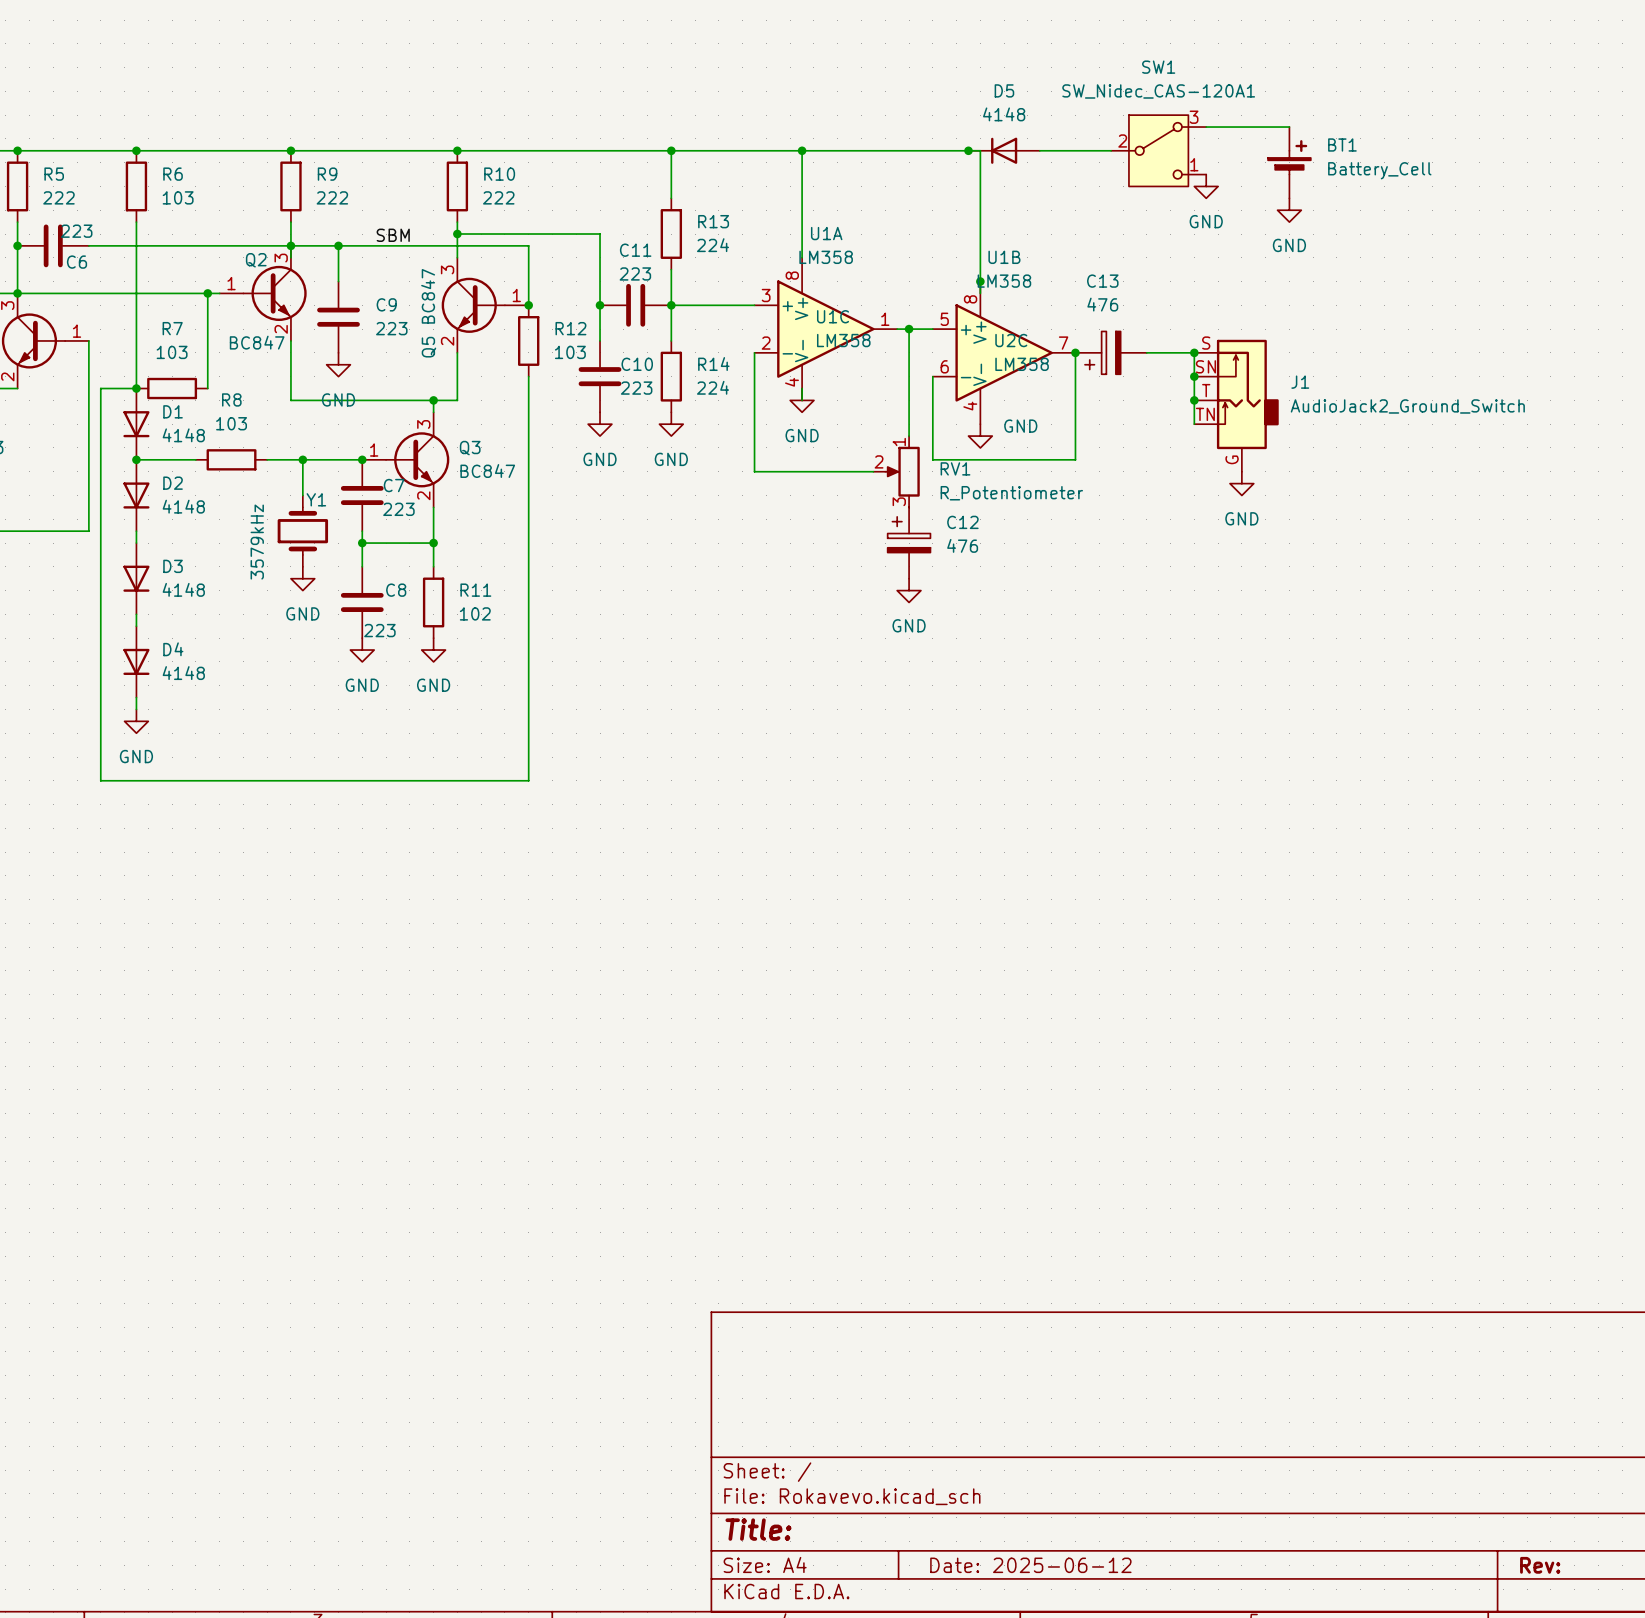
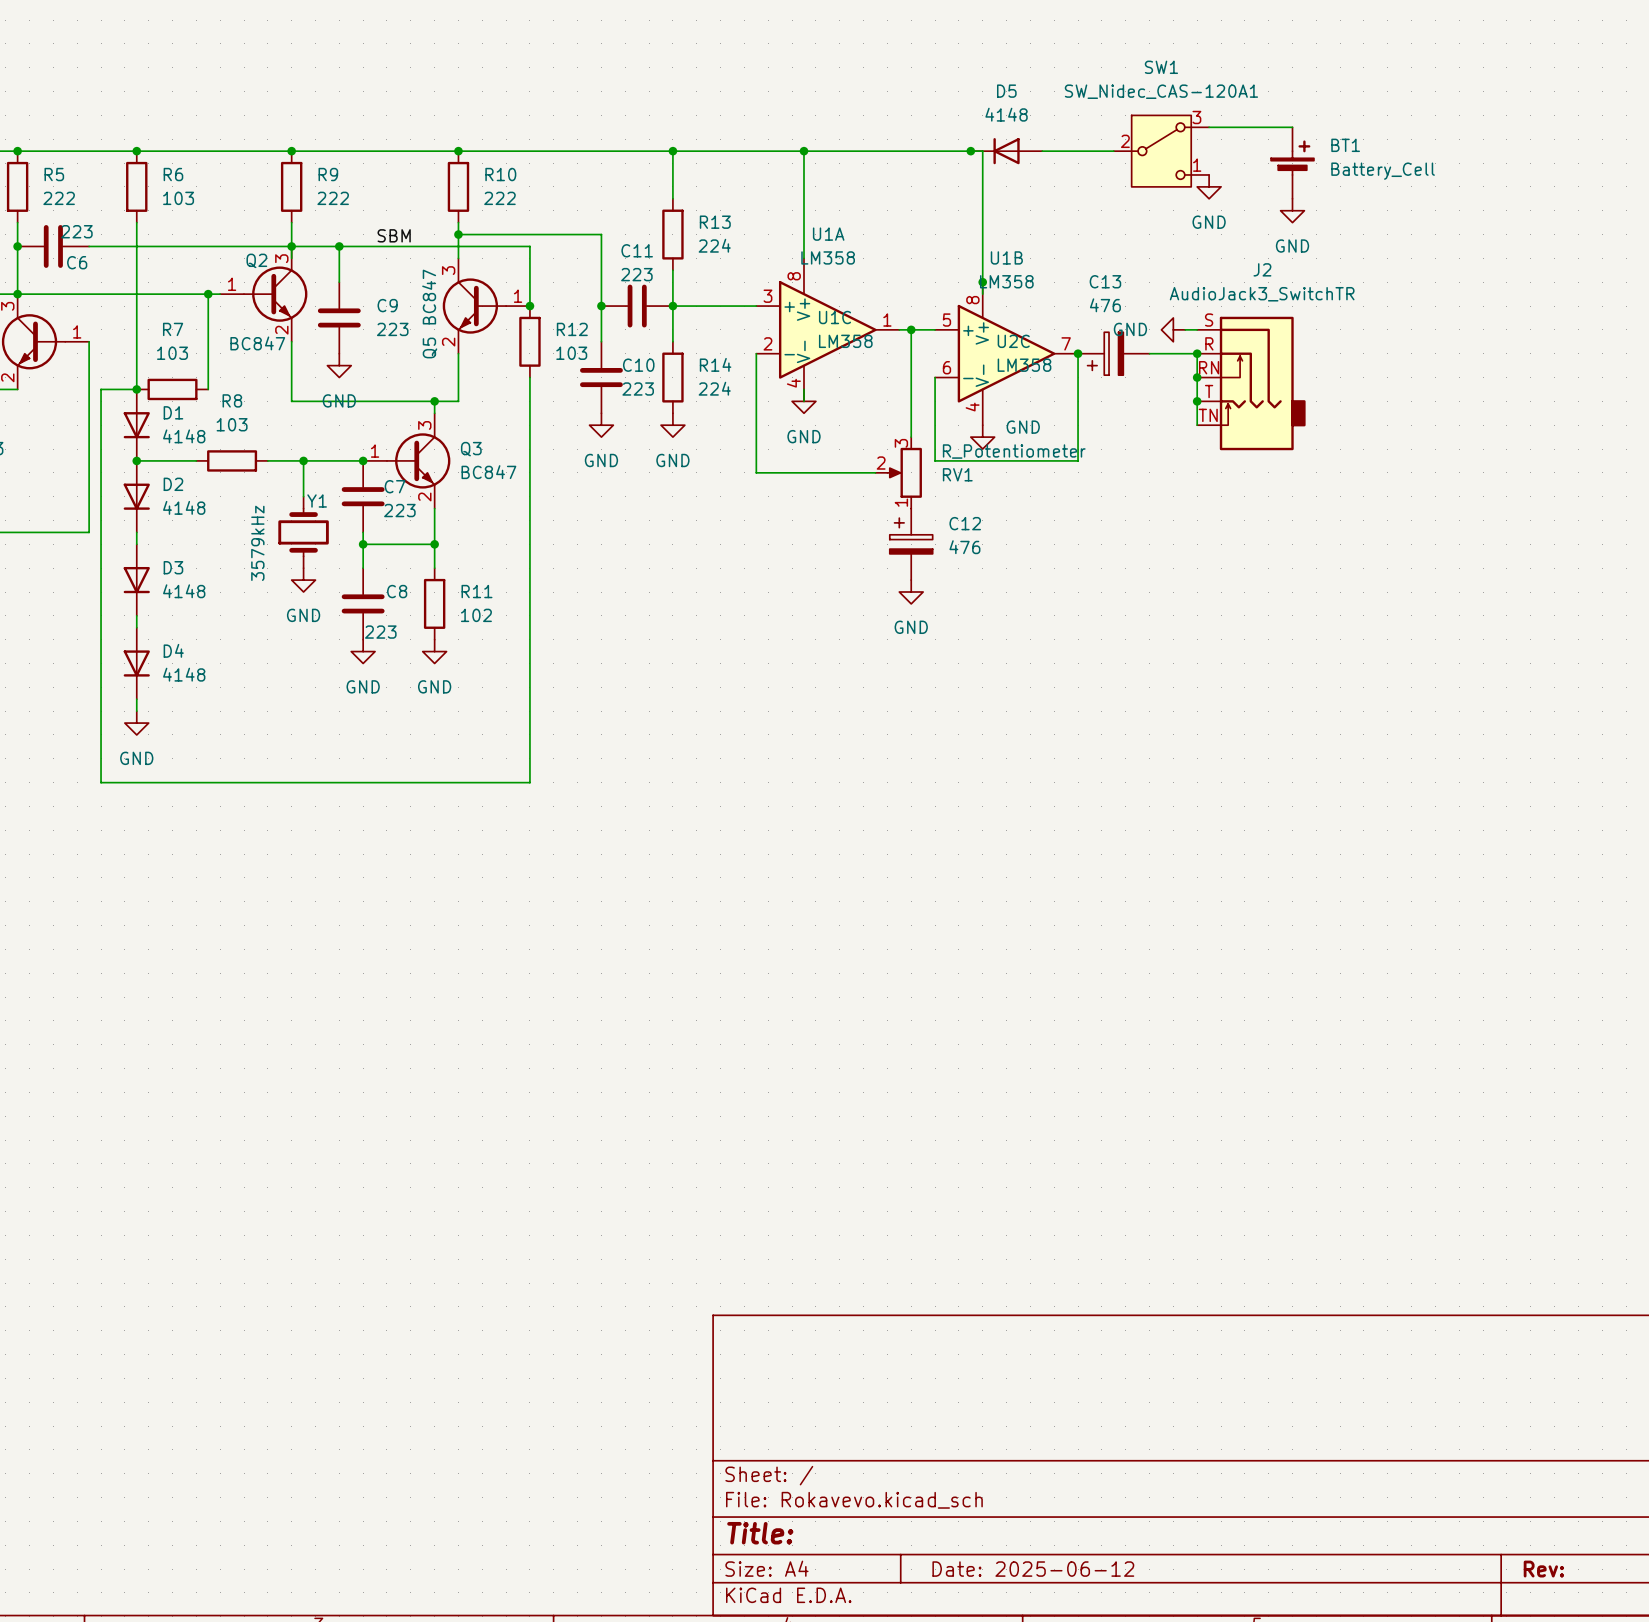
wire: none -> (1185, 329) (1197, 329)
J2: none -> AudioJack3_SwitchTR (1251, 383)
J1: AudioJack2_Ground_Switch (1236, 405) -> none
RV1 flip: as is (902, 471) -> up-down (904, 472)
power symbol rotation: 0° (1241, 483) -> 90° clockwise (1173, 329)
power symbol position: GND (1241, 483) -> GND (1173, 329)

